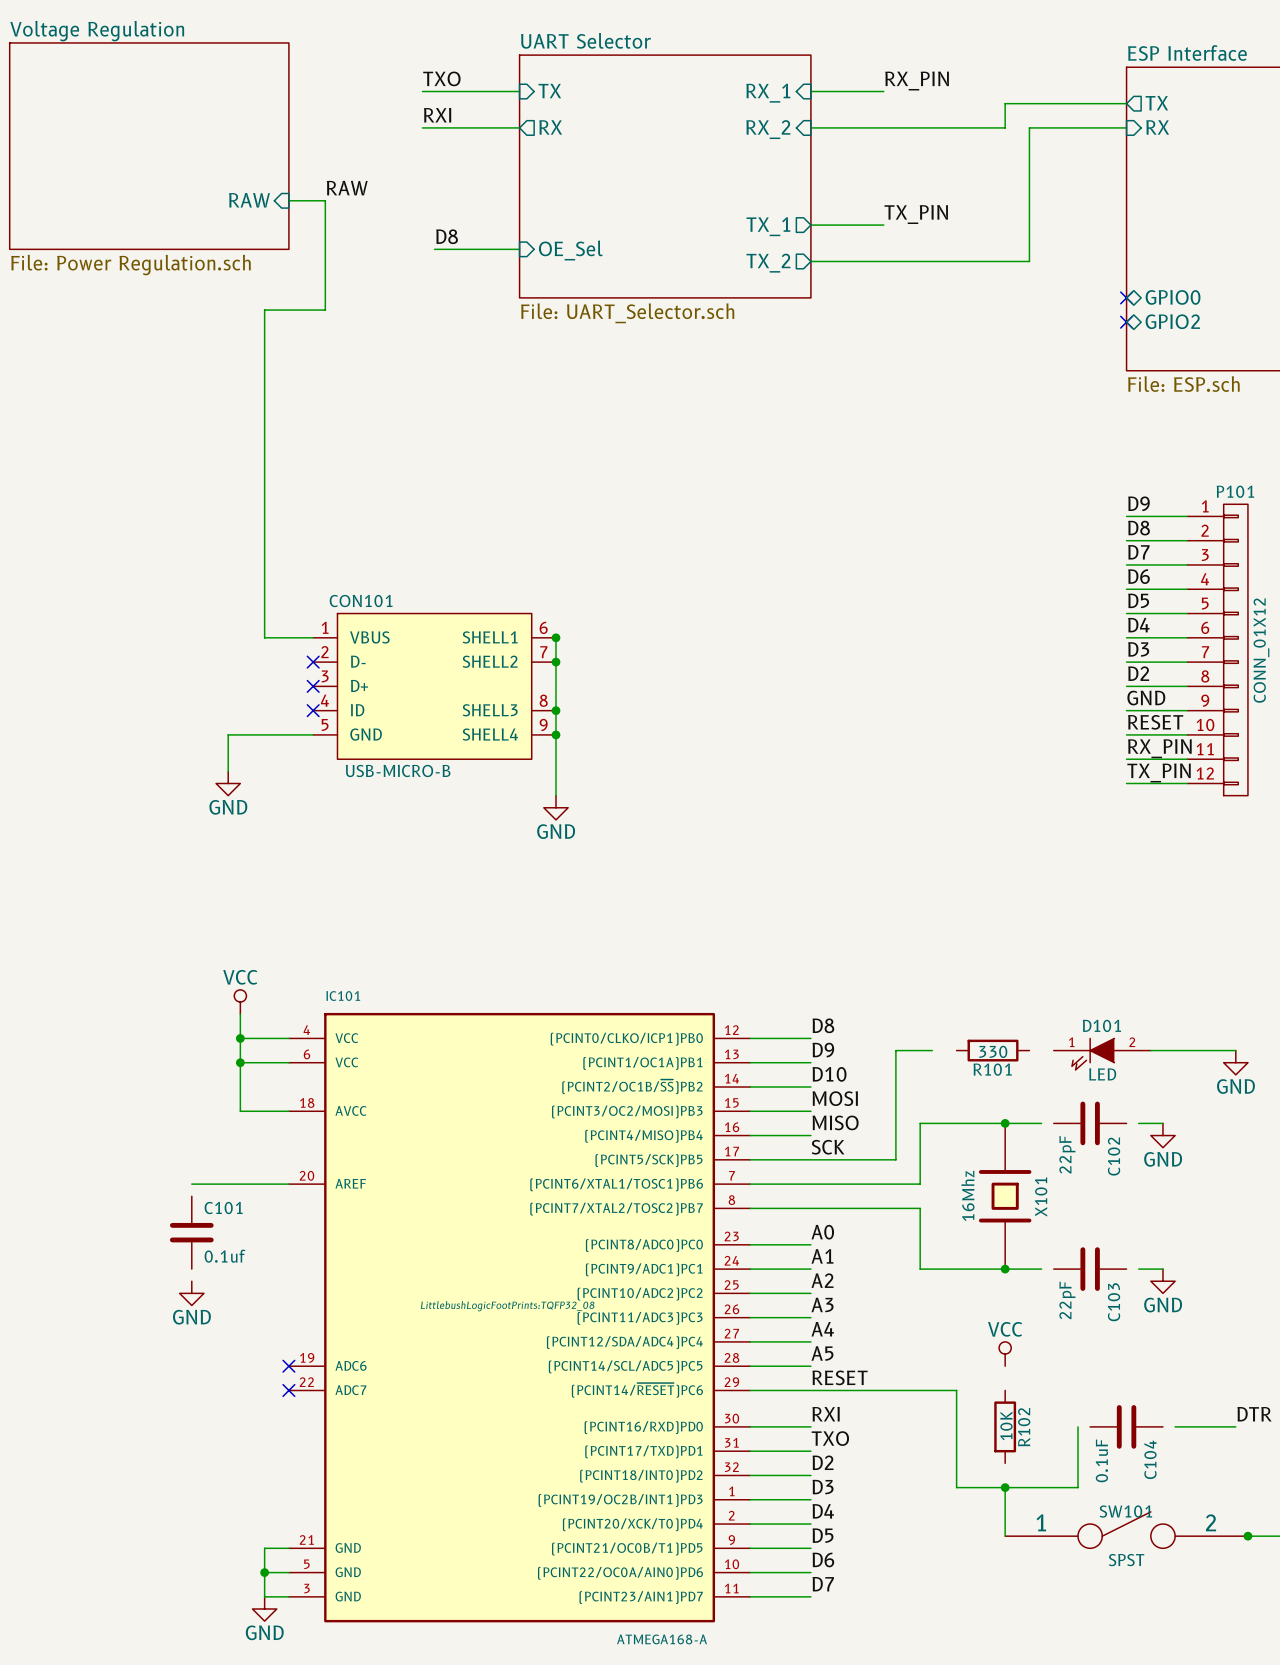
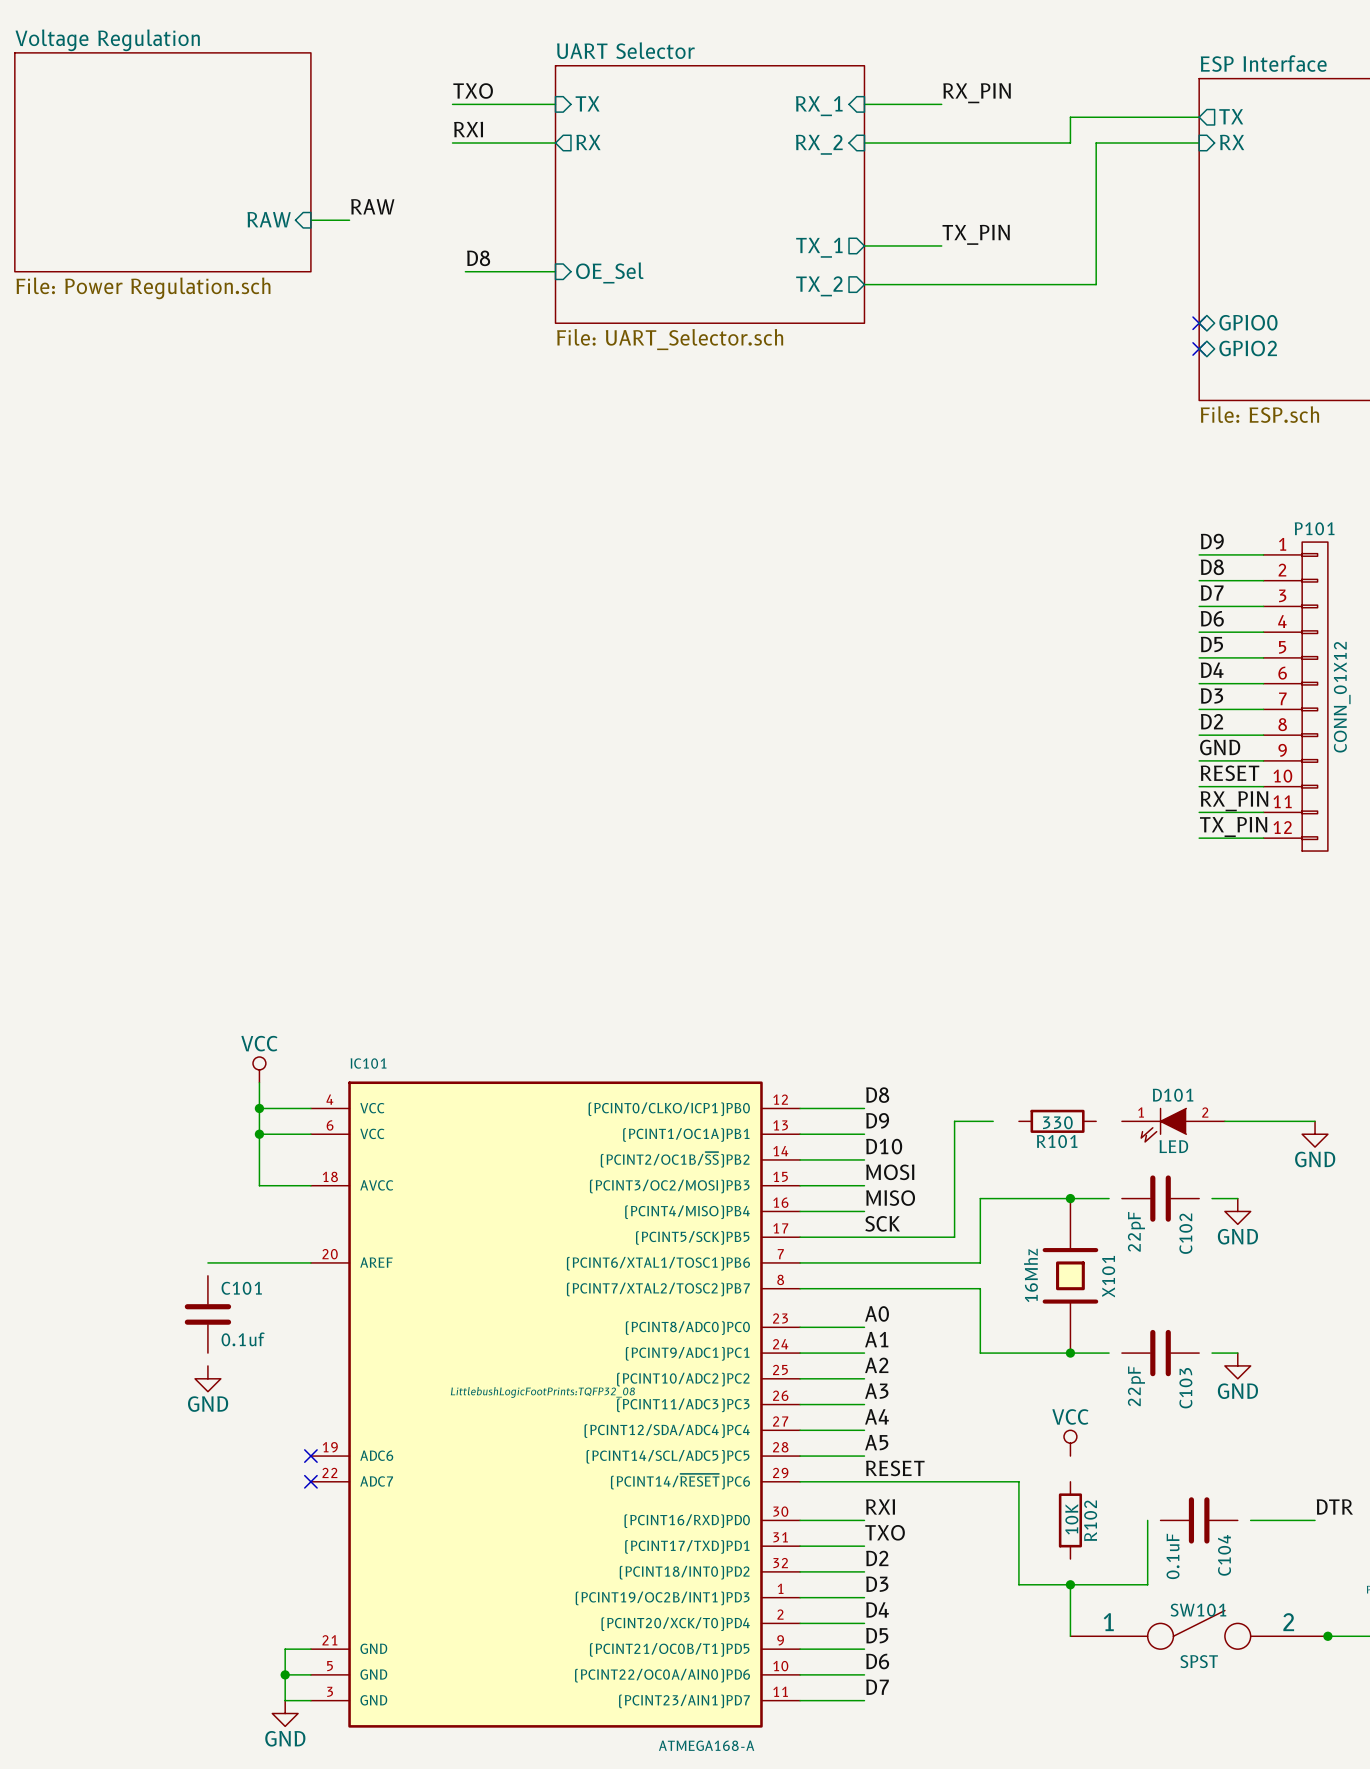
wire: (325, 200) (325, 310) (264, 310) (264, 637) (313, 637) -> none
wire: (555, 637) (555, 795) -> none
junction: (555, 637) -> none
no-connect mark: (313, 662) -> none
junction: (555, 662) -> none
no-connect mark: (313, 686) -> none
CON101: USB-MICRO-B (434, 686) -> none
no-connect mark: (313, 710) -> none
junction: (555, 710) -> none
wire: (313, 734) (228, 734) (228, 771) -> none
junction: (555, 734) -> none
power symbol: GND (228, 783) -> none
power symbol: GND (555, 807) -> none

